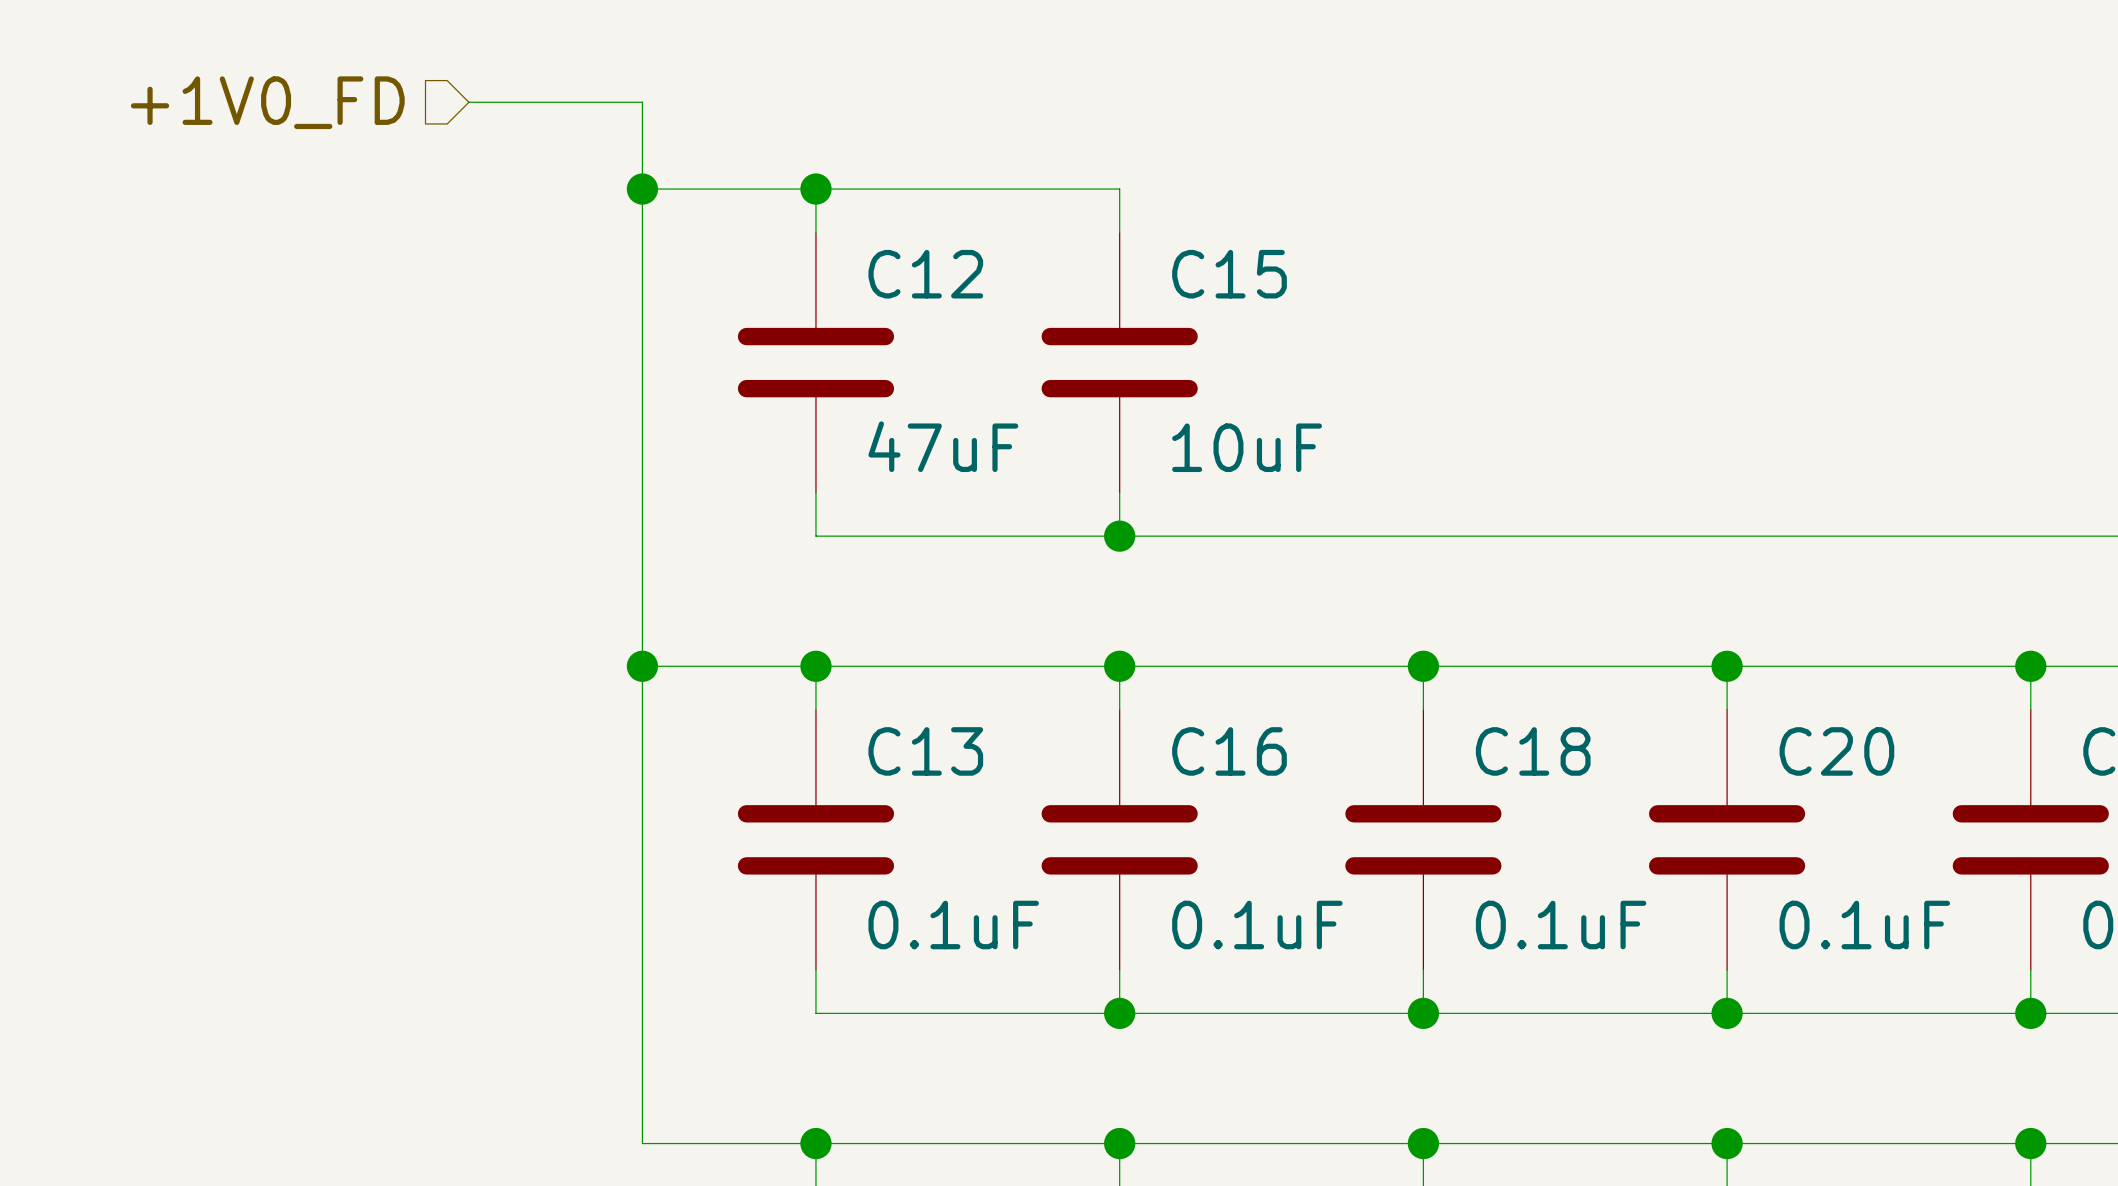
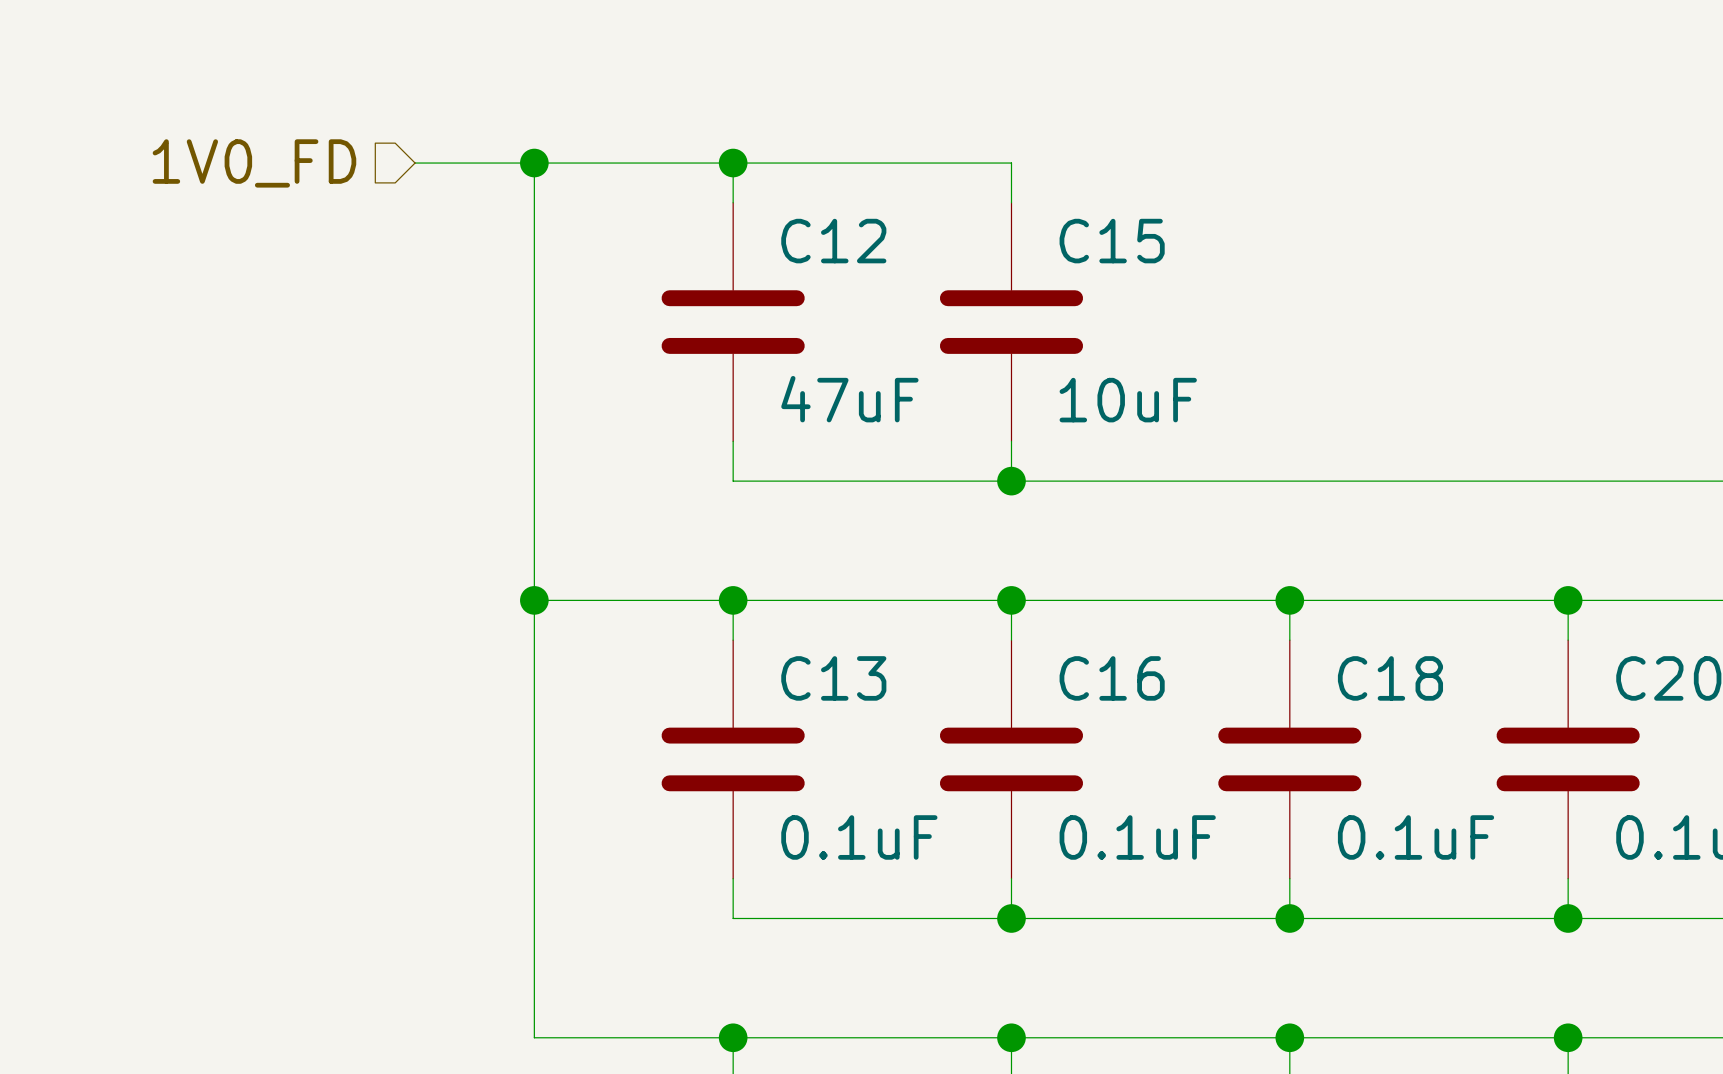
hierarchical label: +1V0_FD (267, 102) -> 1V0_FD (254, 163)
wire: (468, 102) (642, 102) (642, 1143) -> (534, 163) (534, 1037) (574, 1037)
wire: none -> (415, 163) (574, 163)
junction position: (642, 189) -> (534, 163)
wire: none -> (534, 600) (574, 600)
junction position: (642, 666) -> (534, 600)

